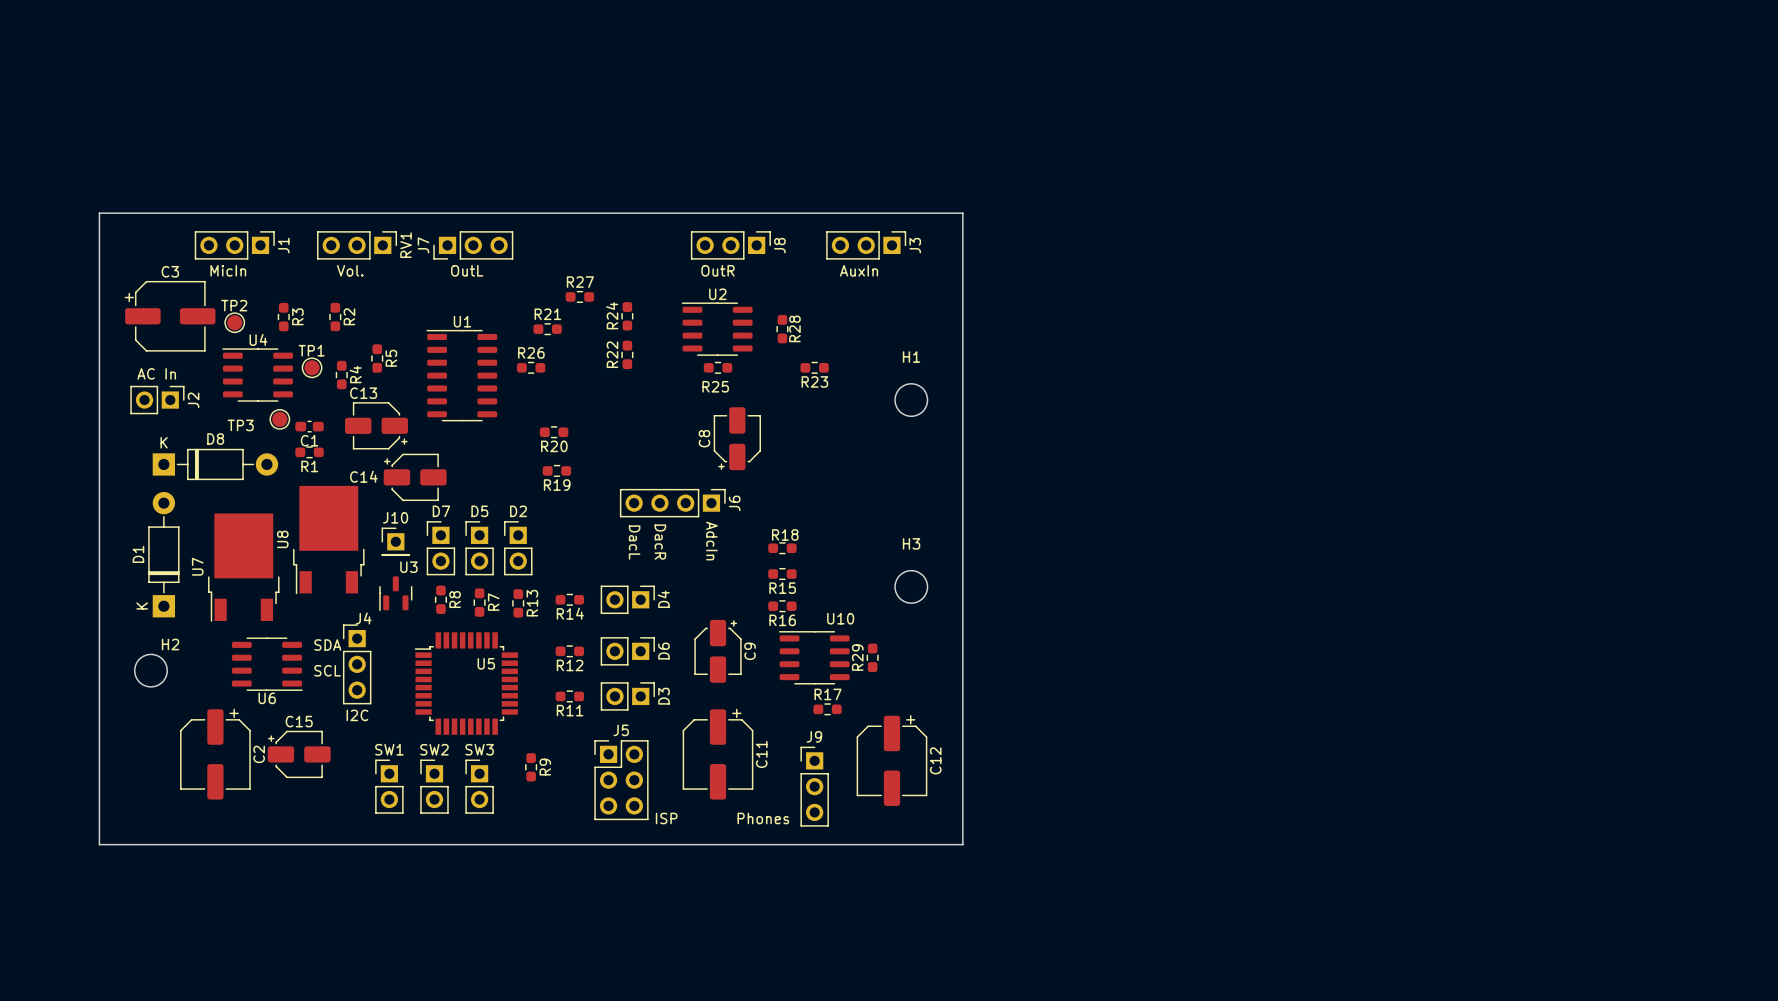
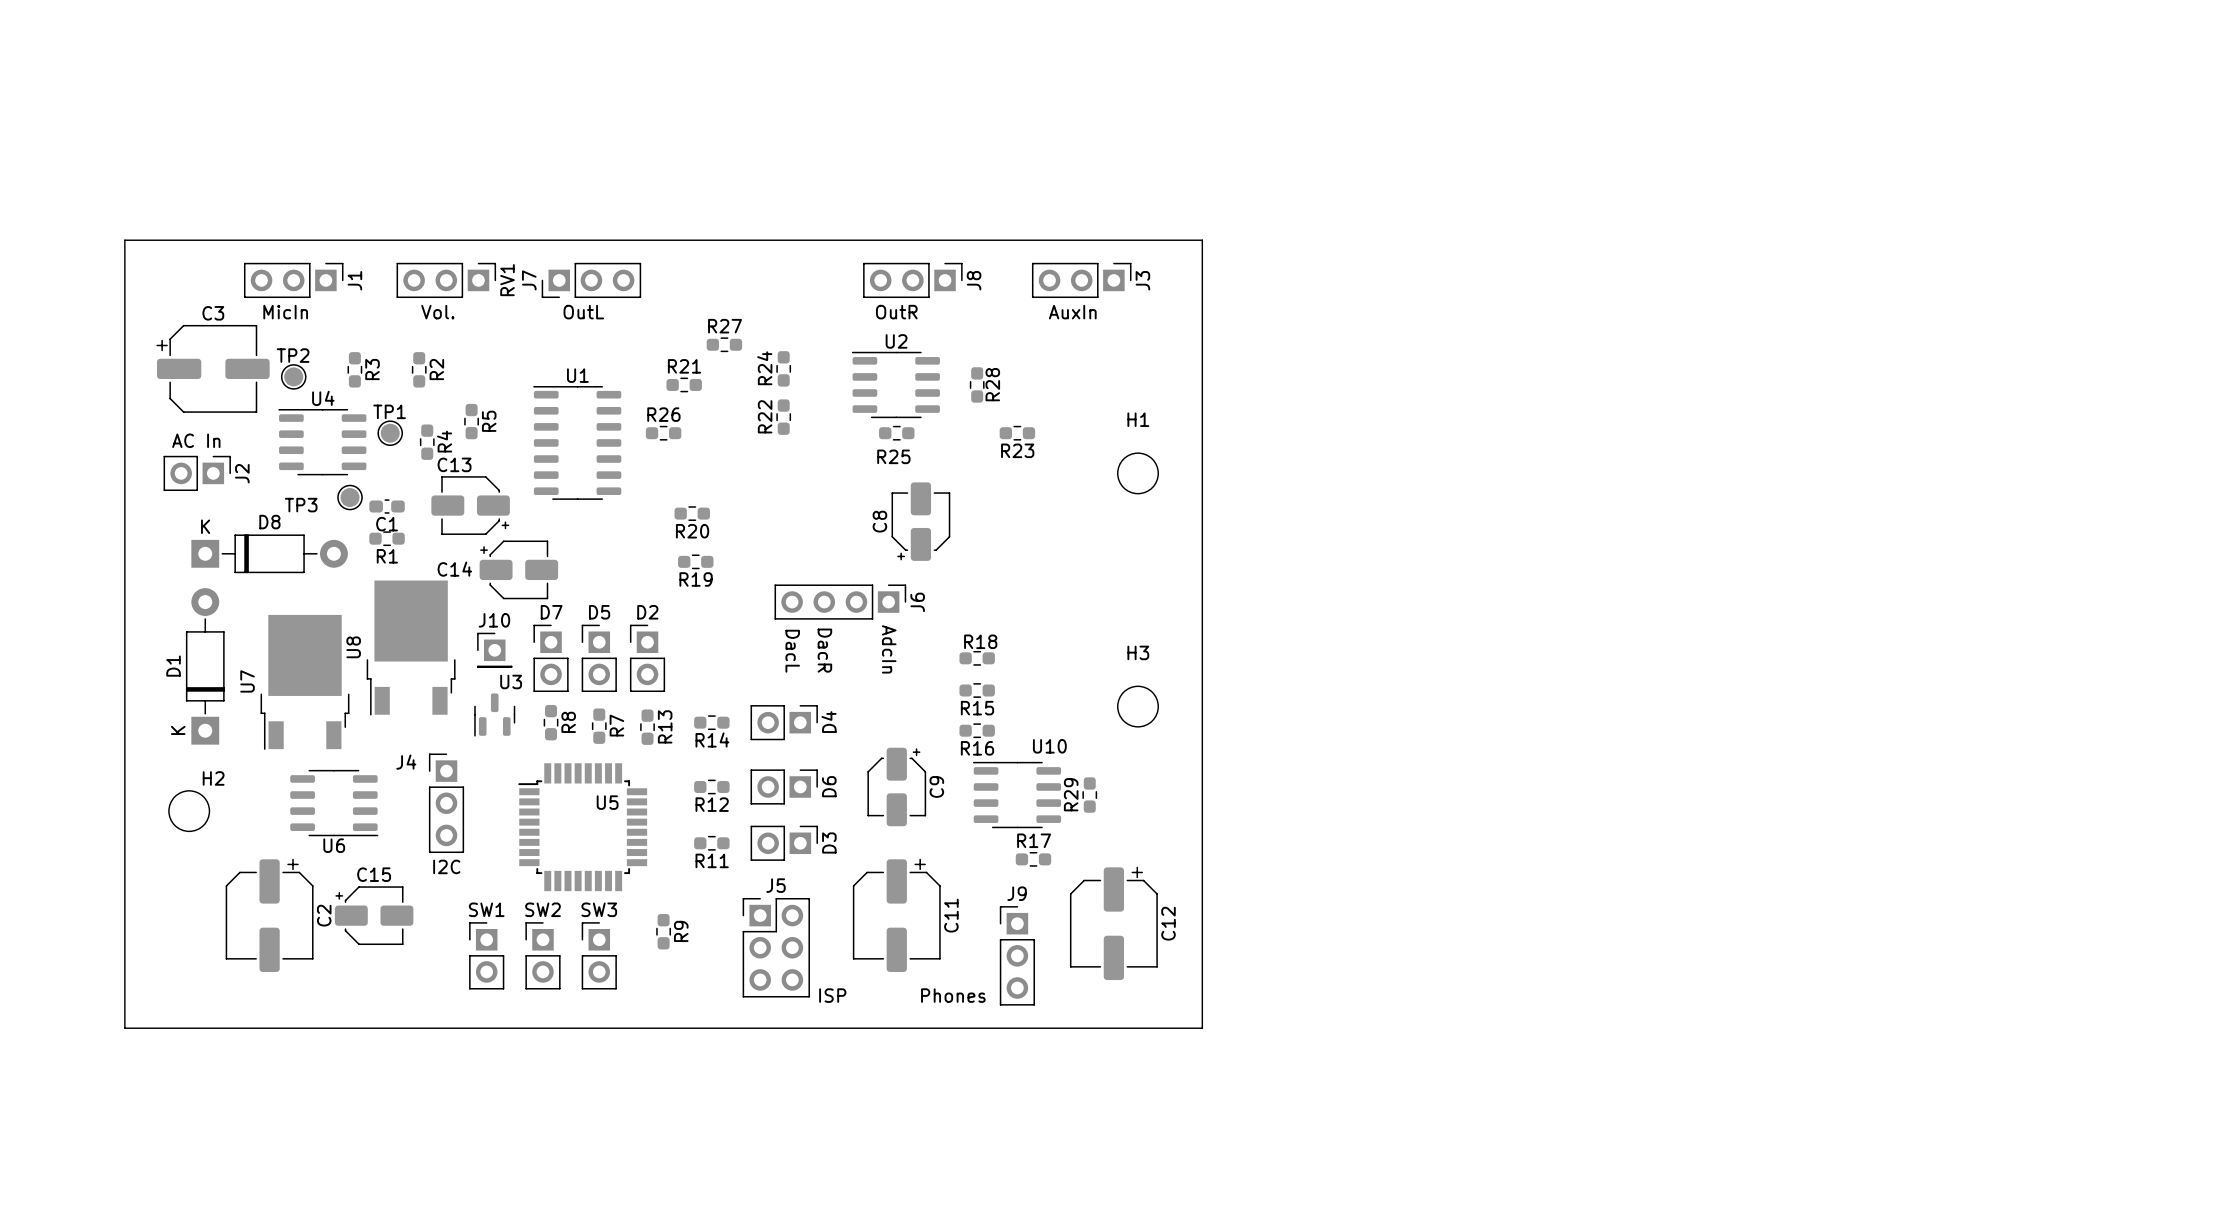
J4 name position: J4 (363, 618) -> J4 (406, 762)
text: SDA (327, 645) -> none
text: SCL (327, 670) -> none

